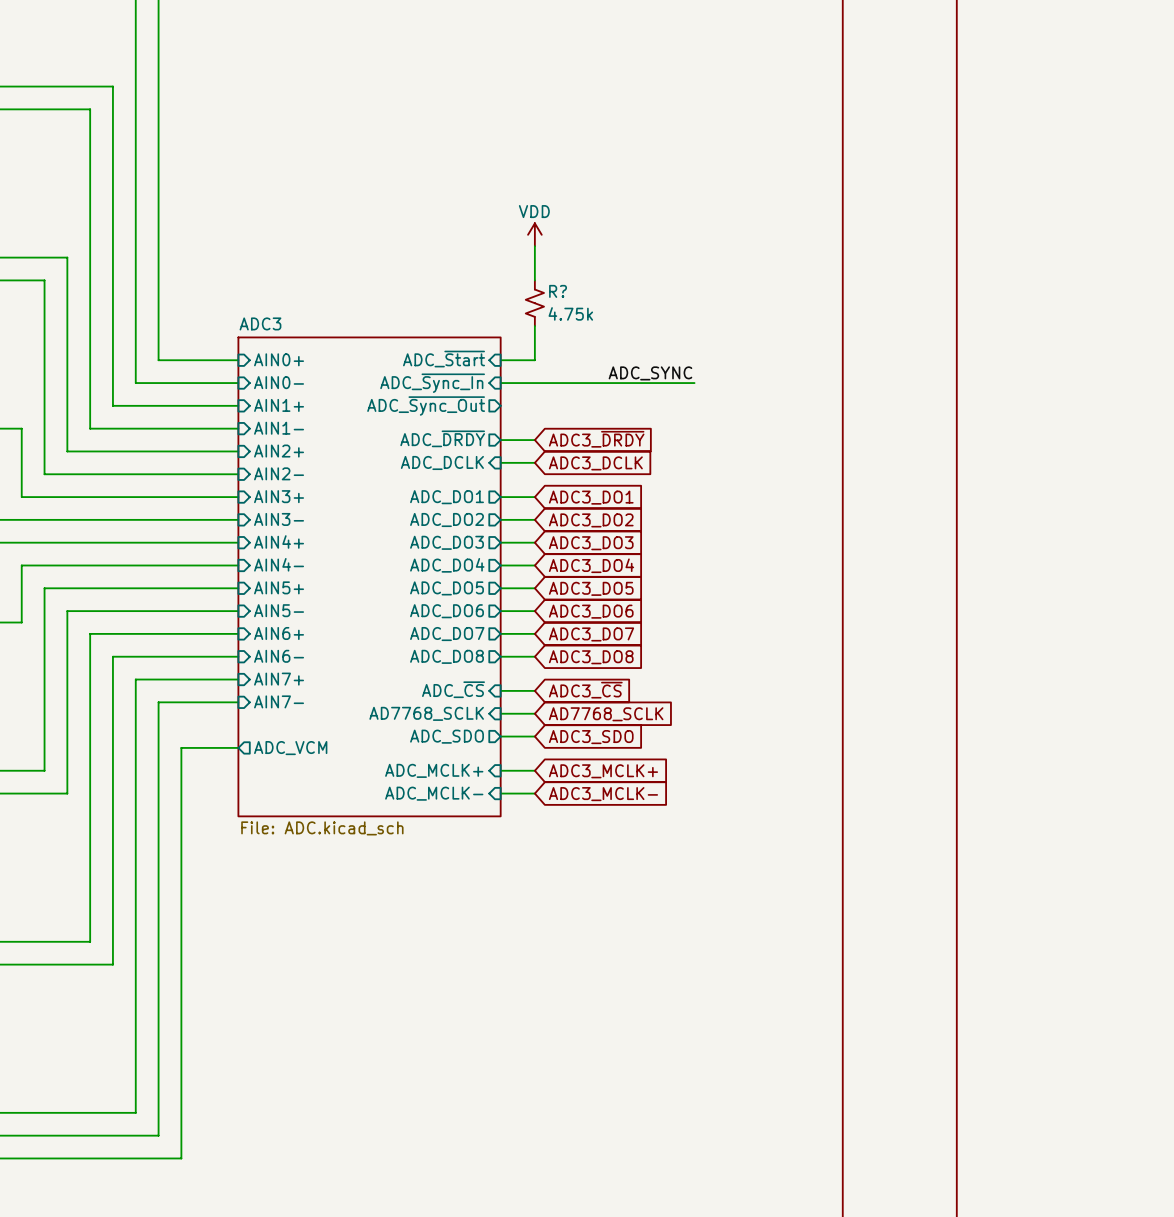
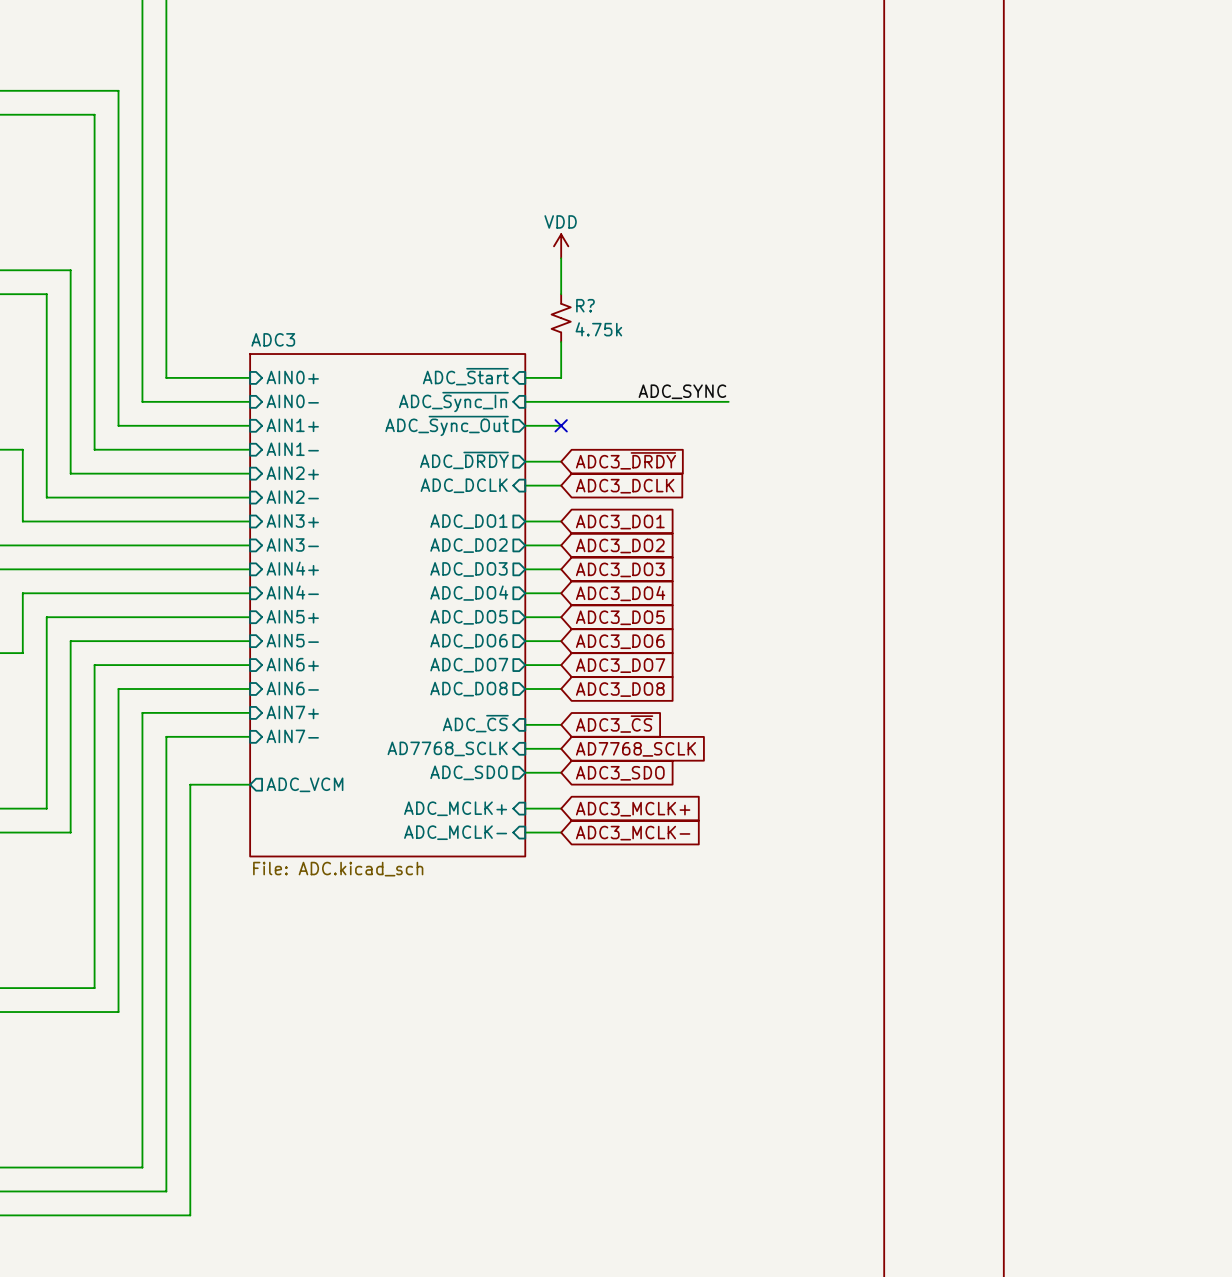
wire: none -> (525, 425) (561, 425)
no-connect mark: none -> (561, 425)

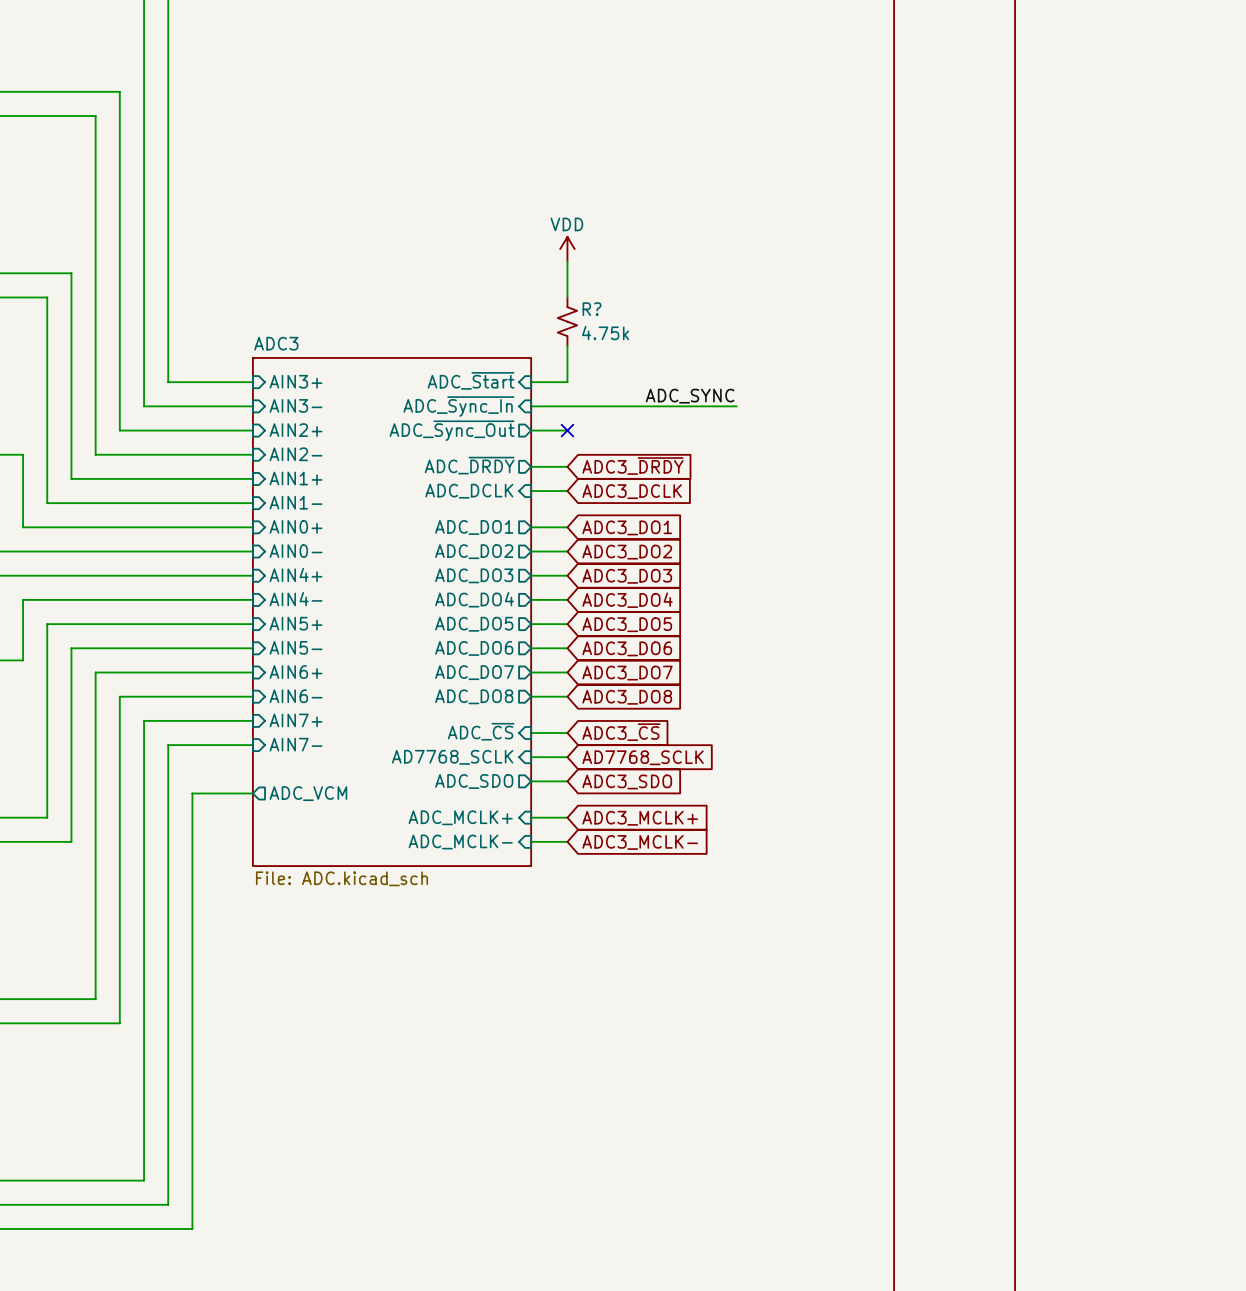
sheet pin: AIN0+ (292, 377) -> AIN3+ (296, 381)
sheet pin: AIN0- (292, 401) -> AIN3- (296, 405)
sheet pin: AIN1+ (292, 425) -> AIN2+ (296, 430)
sheet pin: AIN1- (292, 449) -> AIN2- (296, 454)
sheet pin: AIN2+ (292, 473) -> AIN1+ (296, 478)
sheet pin: AIN2- (292, 497) -> AIN1- (296, 502)
sheet pin: AIN3+ (292, 521) -> AIN0+ (296, 526)
sheet pin: AIN3- (292, 544) -> AIN0- (296, 551)

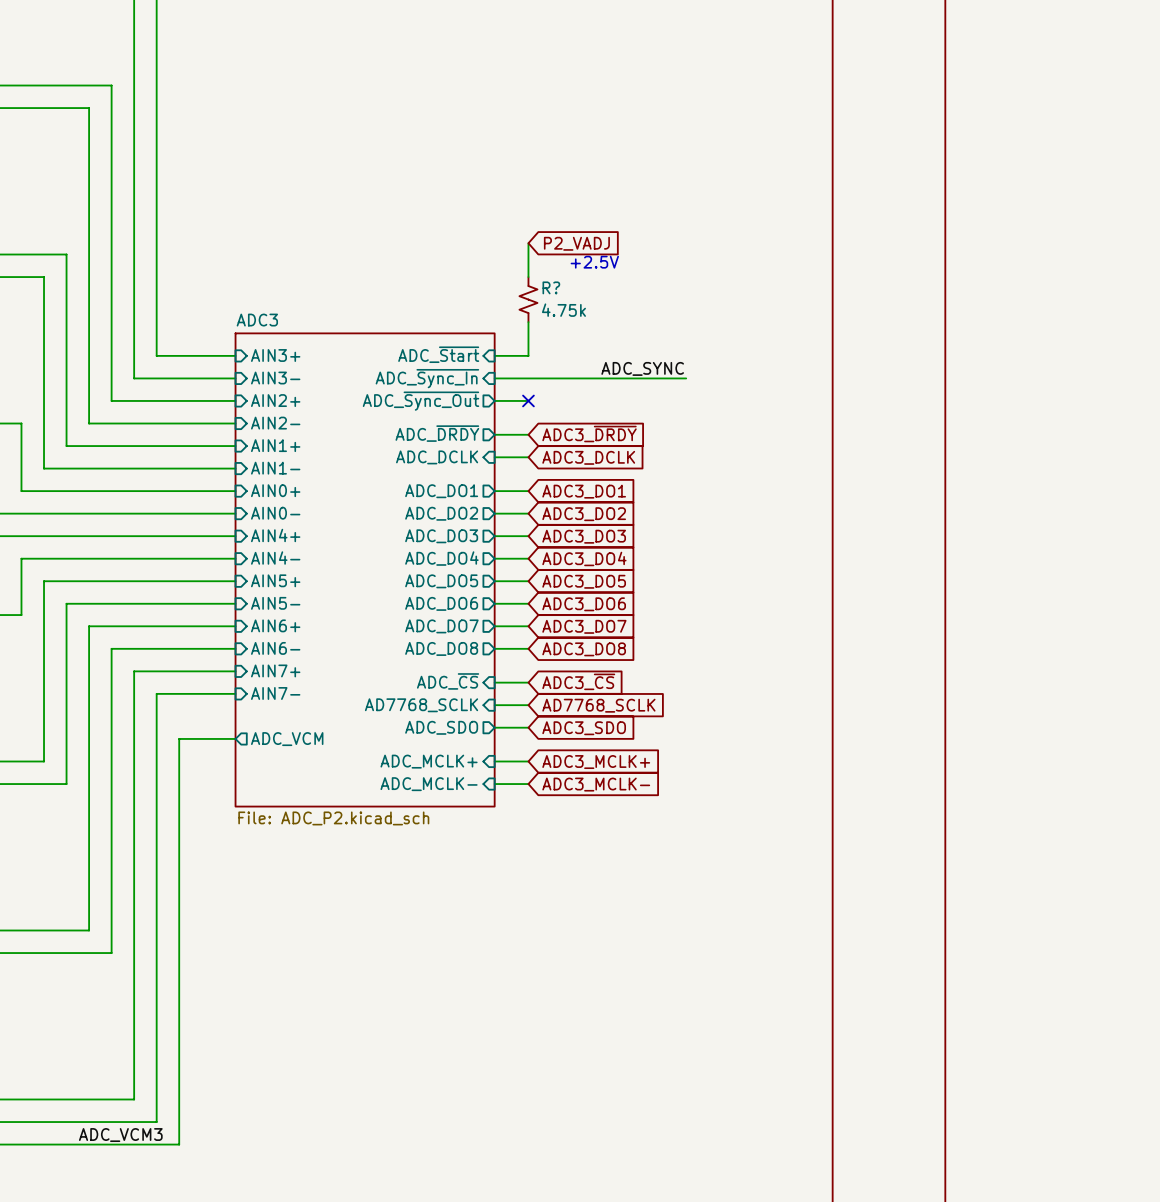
power symbol: VDD (567, 249) -> none
global label: none -> P2_VADJ (576, 243)
text: none -> +2.5V (594, 262)
sheet ADC3 value: File: ADC.kicad_sch (342, 878) -> File: ADC_P2.kicad_sch (333, 818)
label: none -> ADC_VCM3 (120, 1135)

